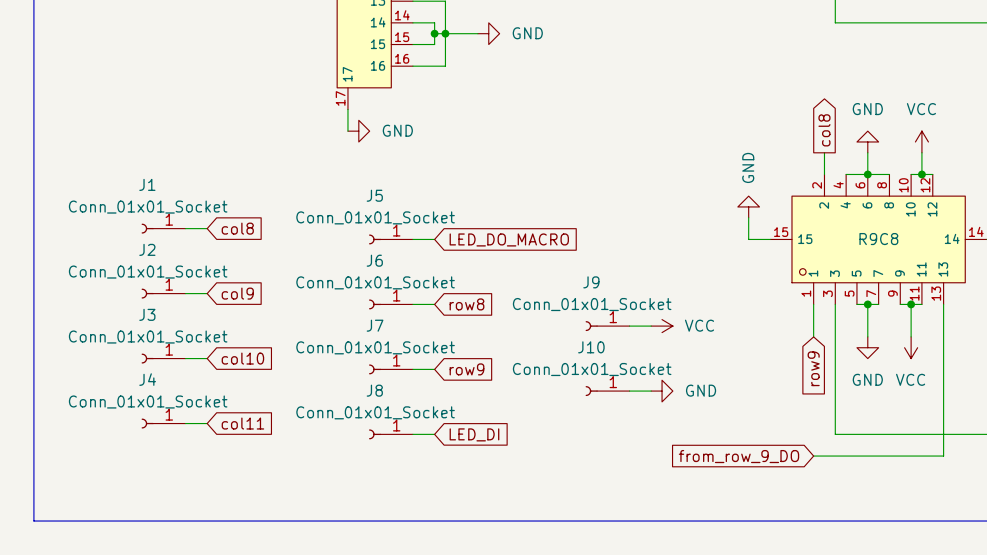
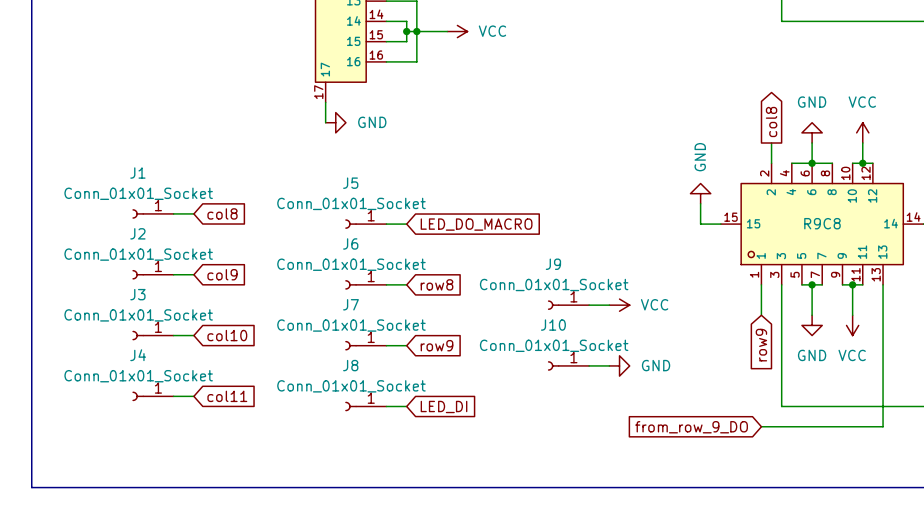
power symbol: GND (488, 33) -> VCC (457, 31)

